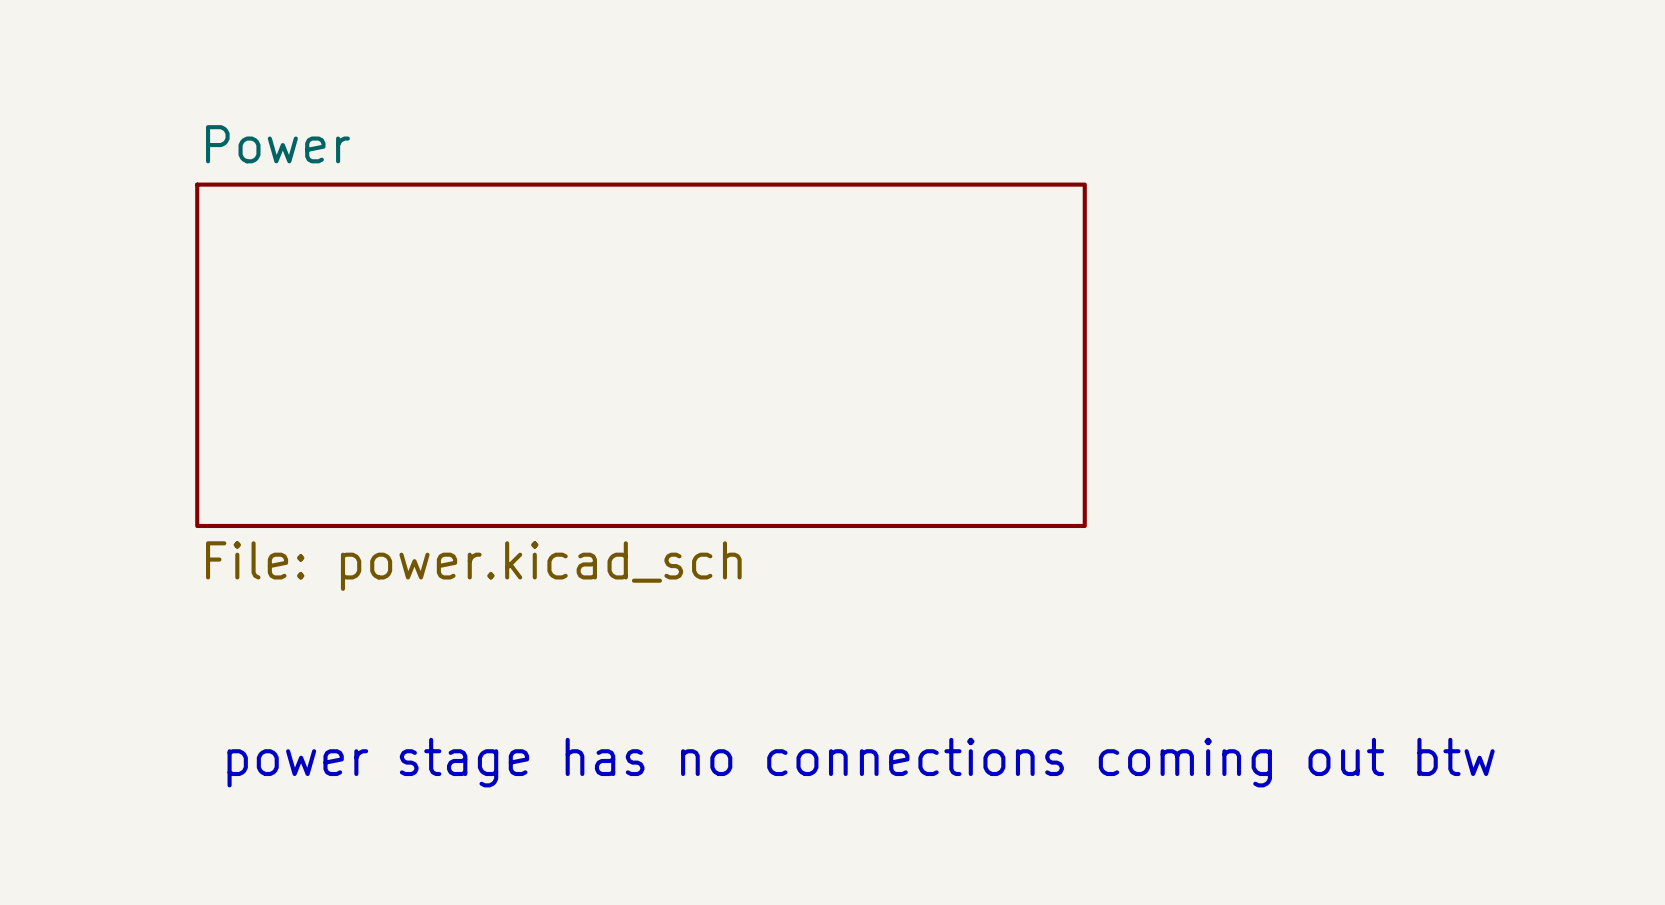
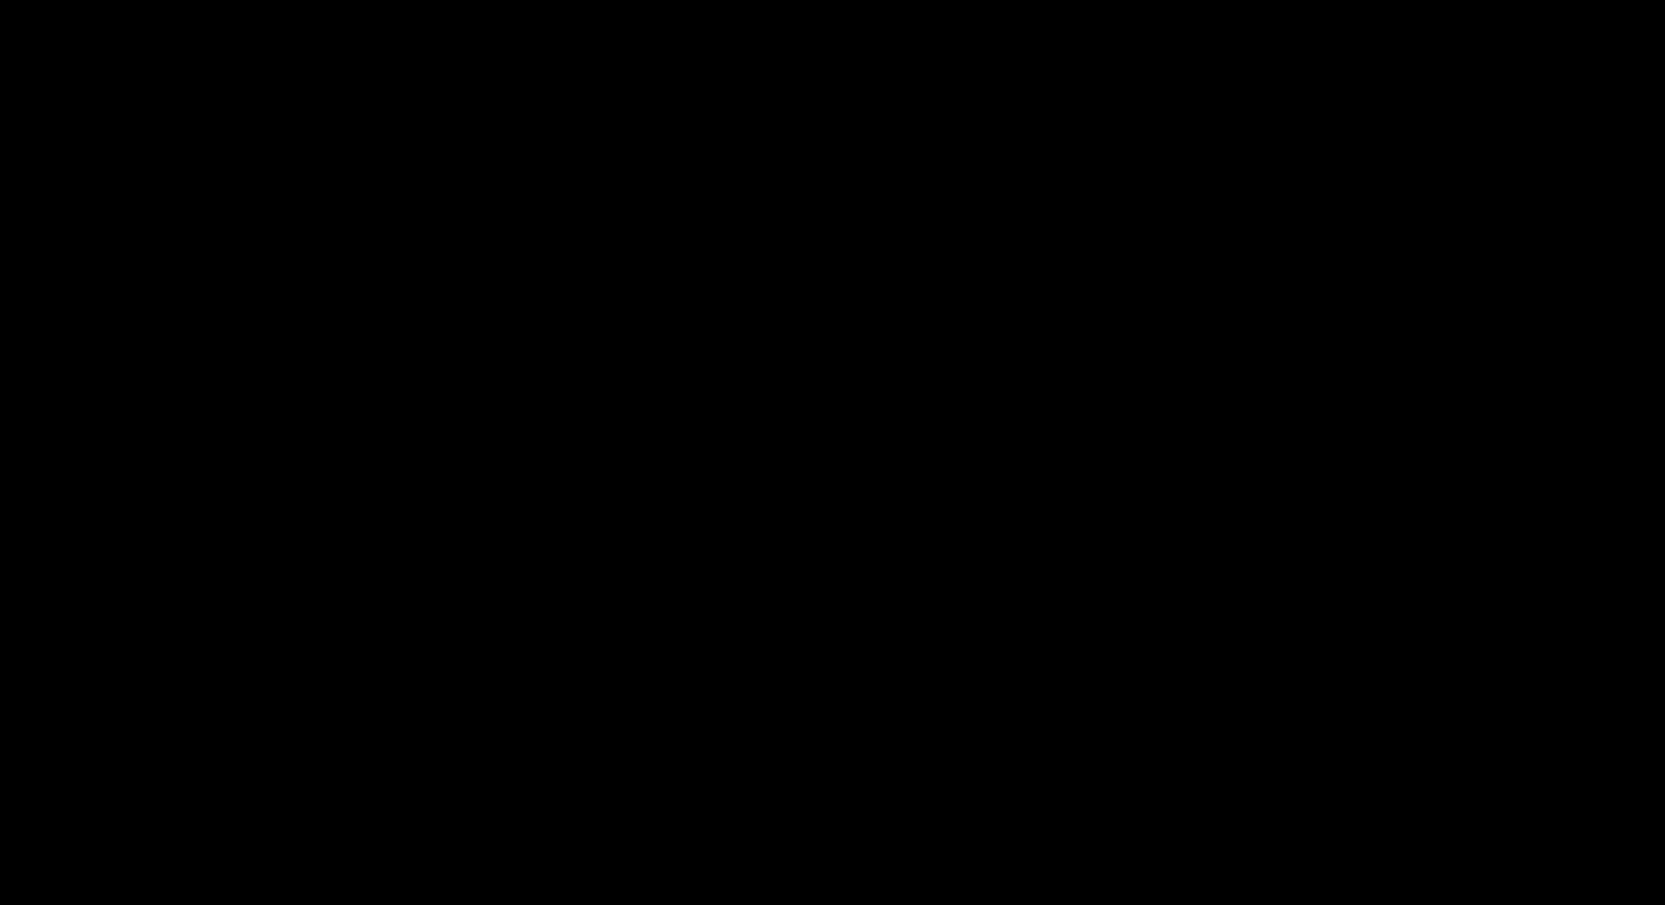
sheet Power: File: power.kicad_sch (641, 355) -> none
text: power stage has no connections coming out btw (861, 762) -> none

